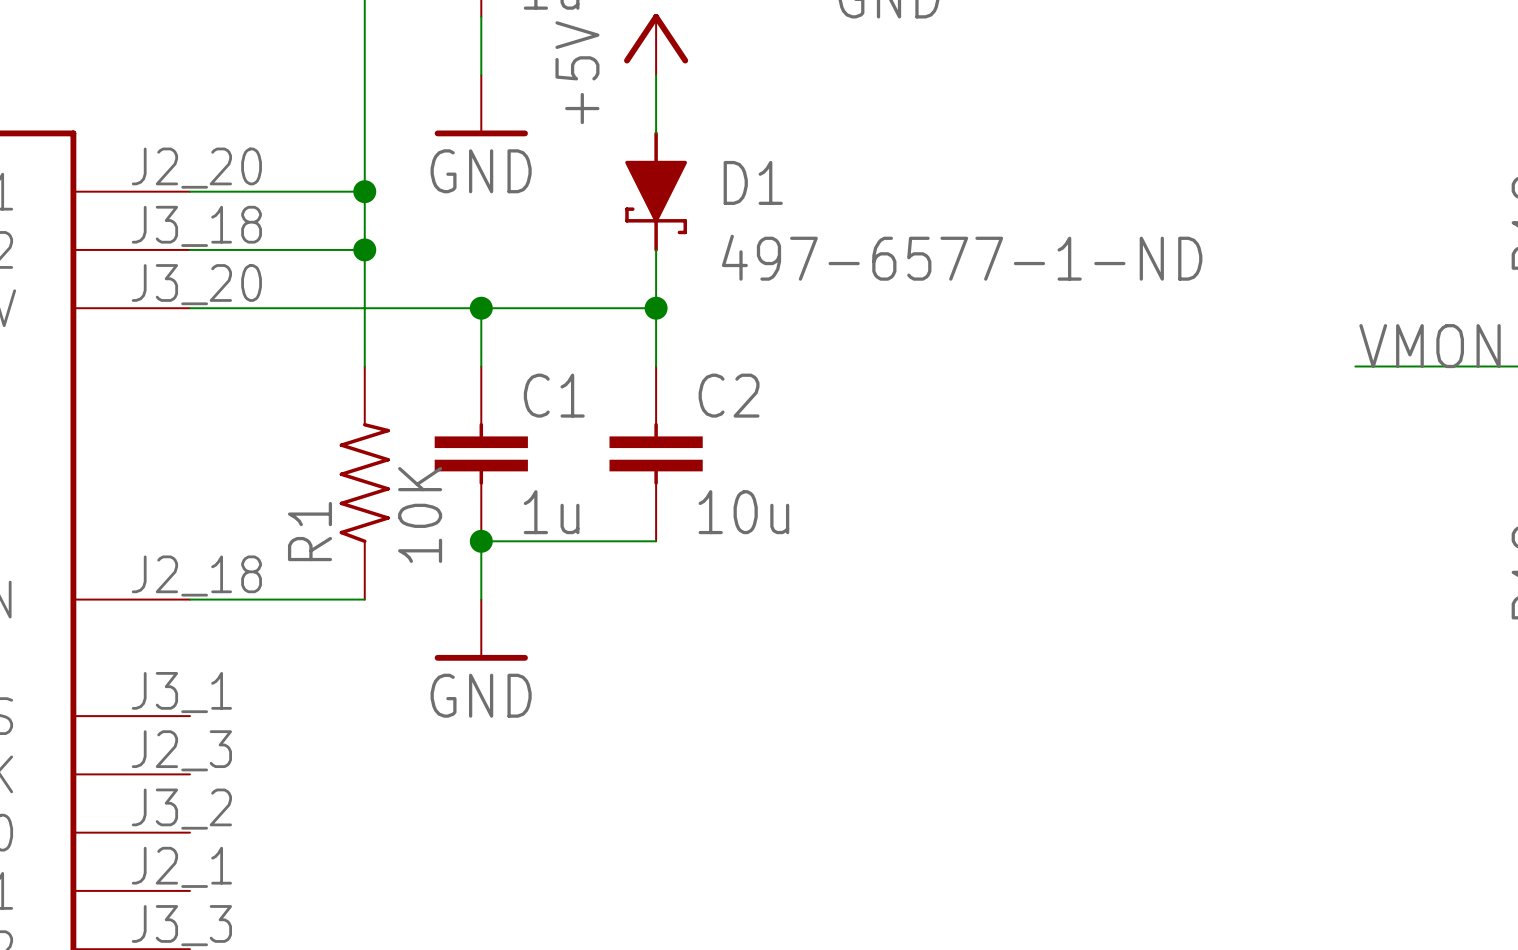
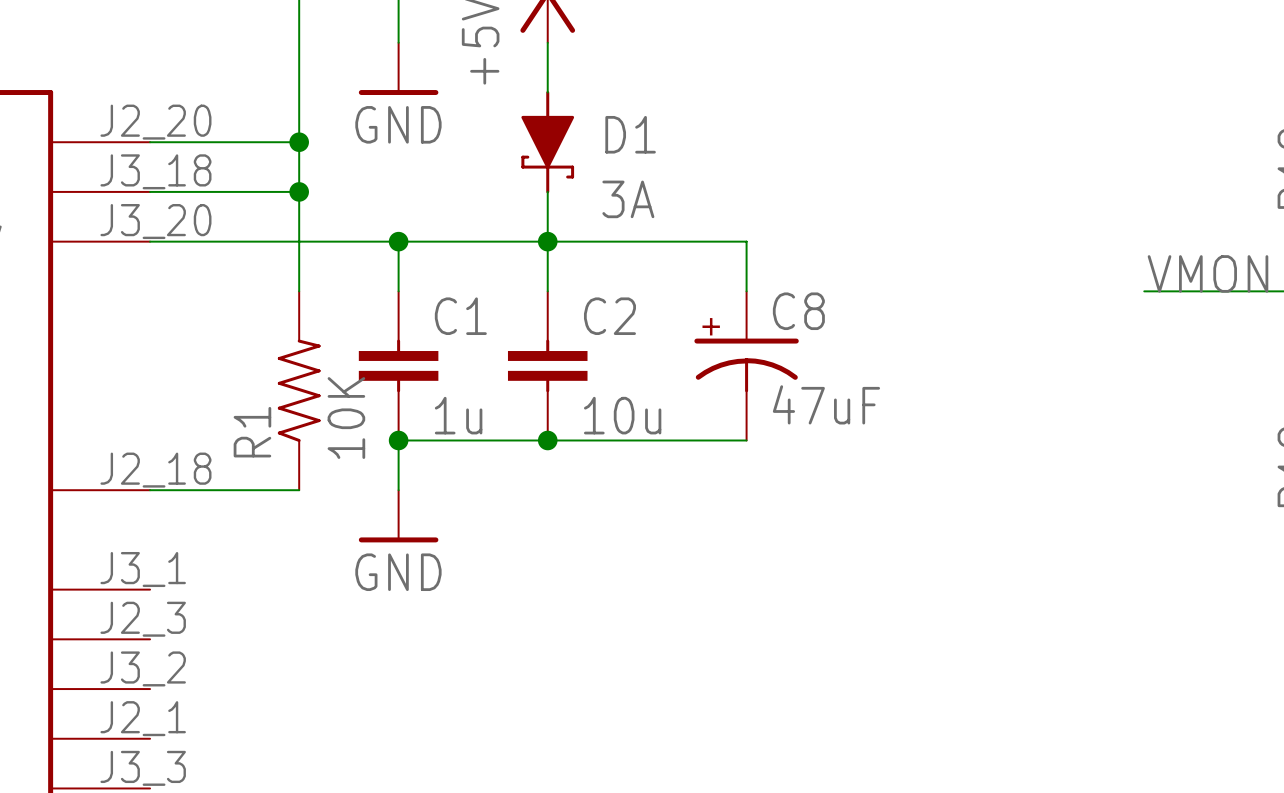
D1 value: 497-6577-1-ND (962, 257) -> 3A (628, 199)
wire: none -> (547, 241) (746, 241) (746, 291)
C8: none -> 47uF (746, 365)
wire: none -> (547, 440) (746, 440)
junction: none -> (547, 440)

